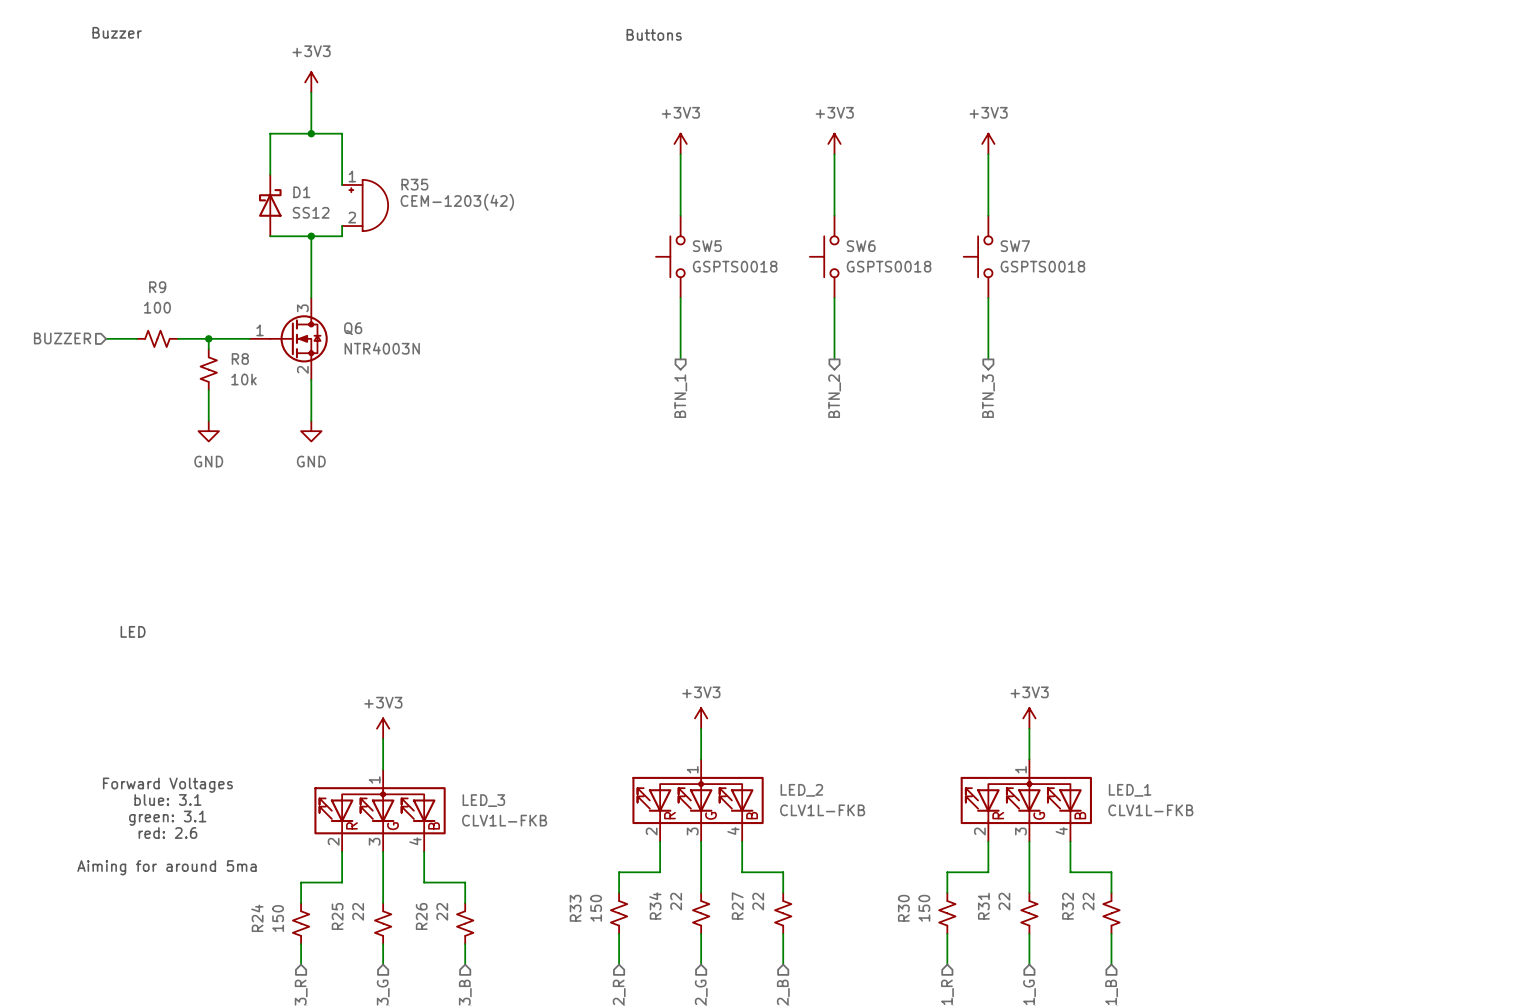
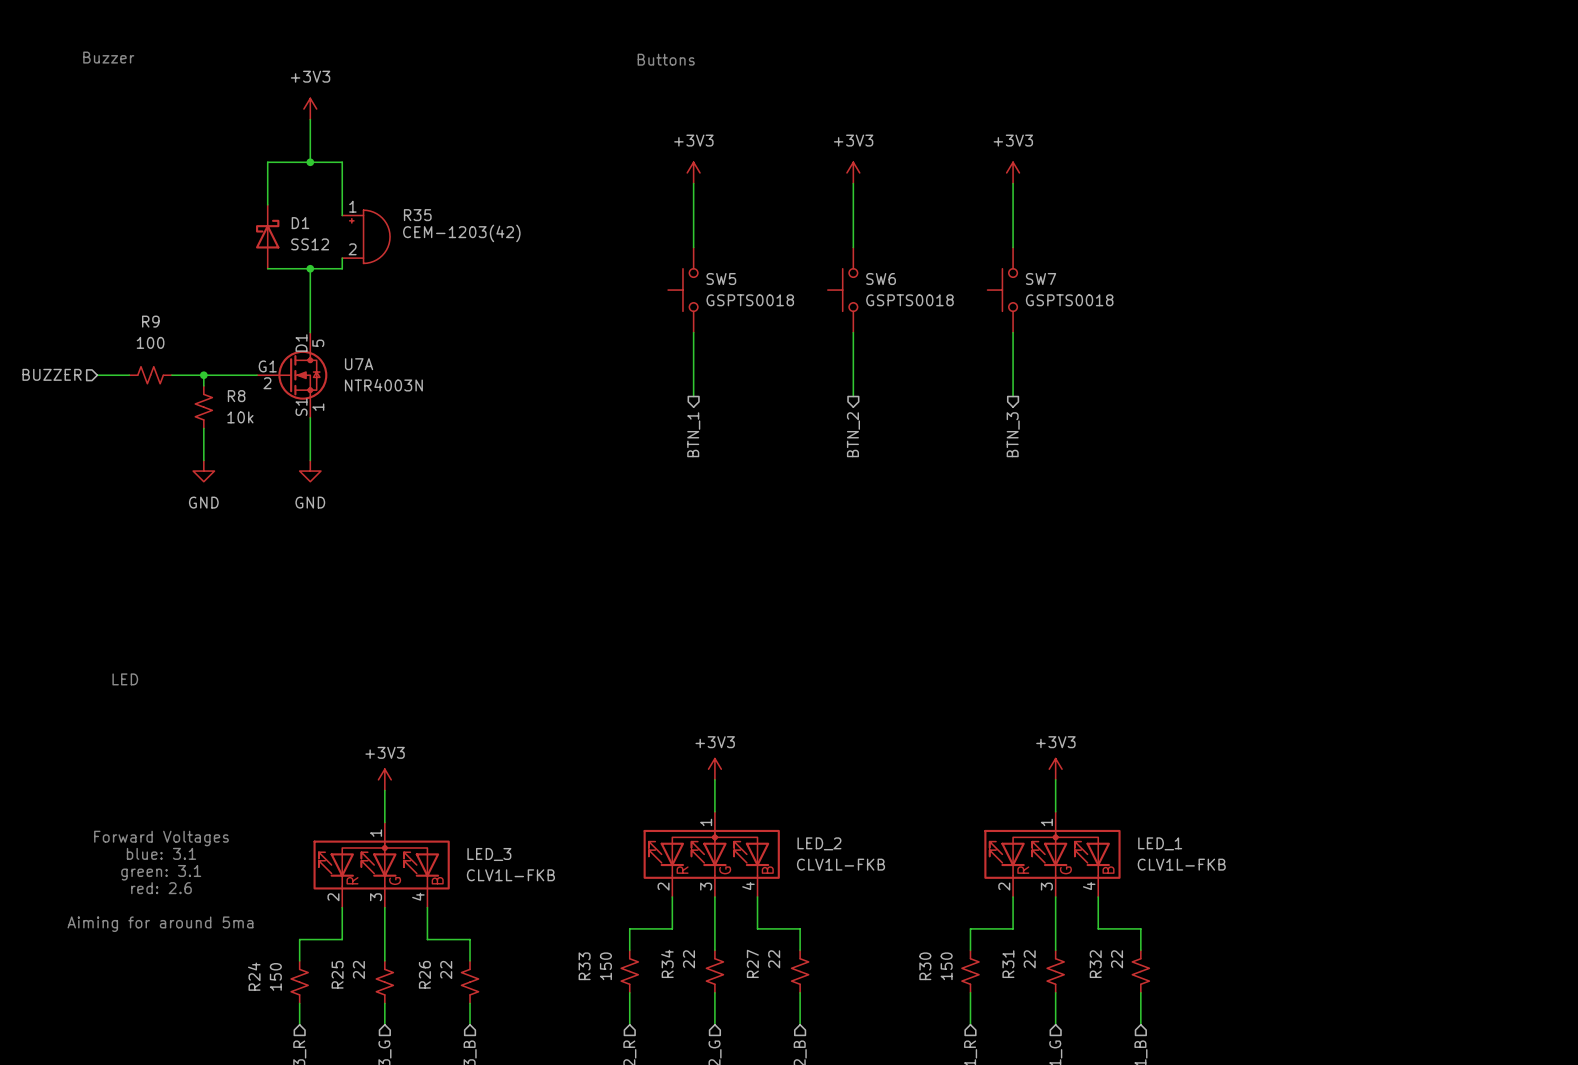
Q6: NTR4003N (288, 338) -> none
U7A: none -> NTR4003N (292, 375)

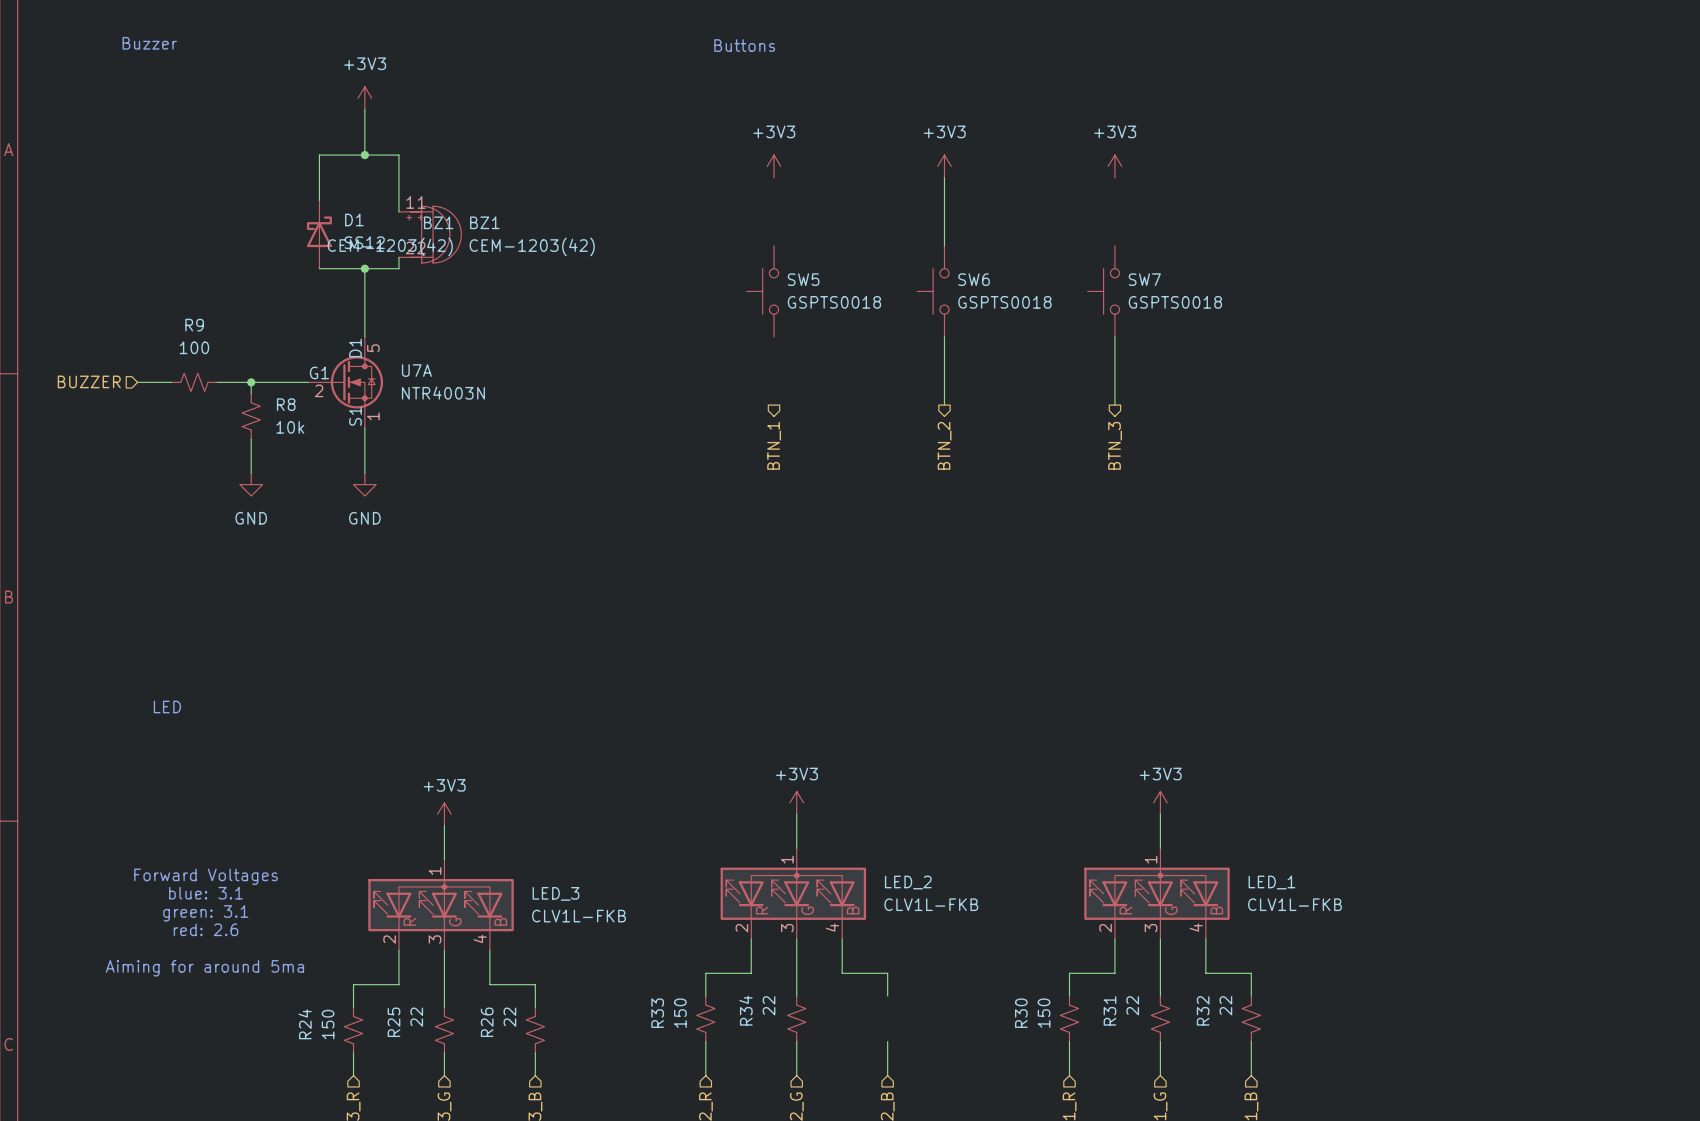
wire: (693, 183) (693, 247) -> none
wire: (1013, 183) (1013, 247) -> none
R35 name: R35 (417, 215) -> BZ1 (438, 222)
R35 value position: CEM-1203(42) (461, 233) -> CEM-1203(42) (390, 246)
BZ1: none -> CEM-1203(42) (435, 234)
wire: (693, 332) (693, 396) -> none
R27: 22 (800, 971) -> none

